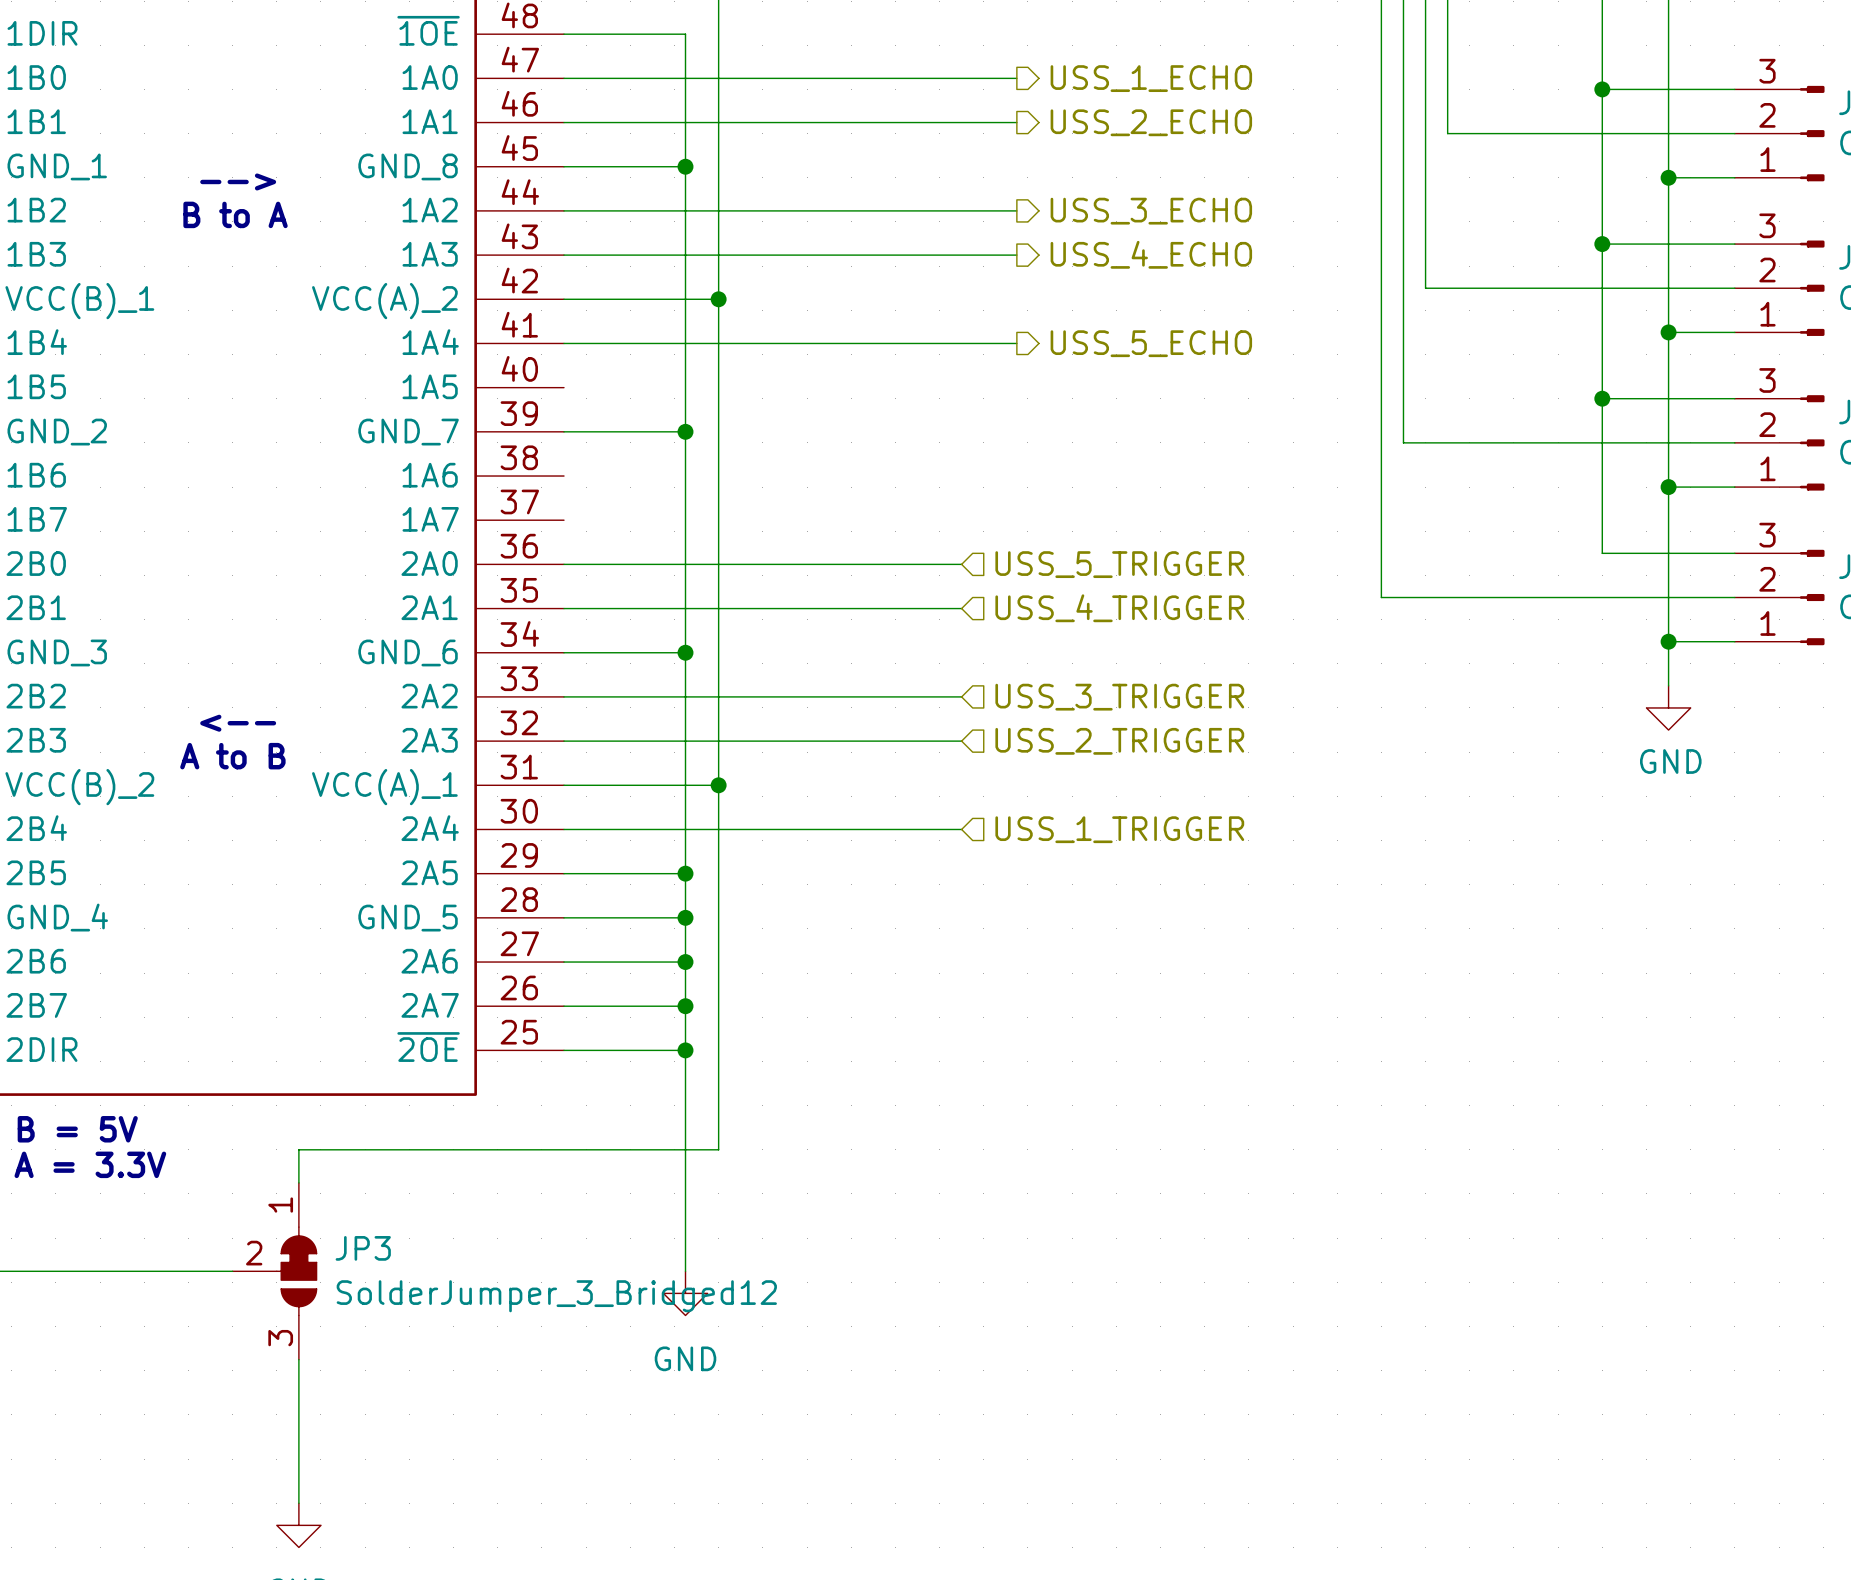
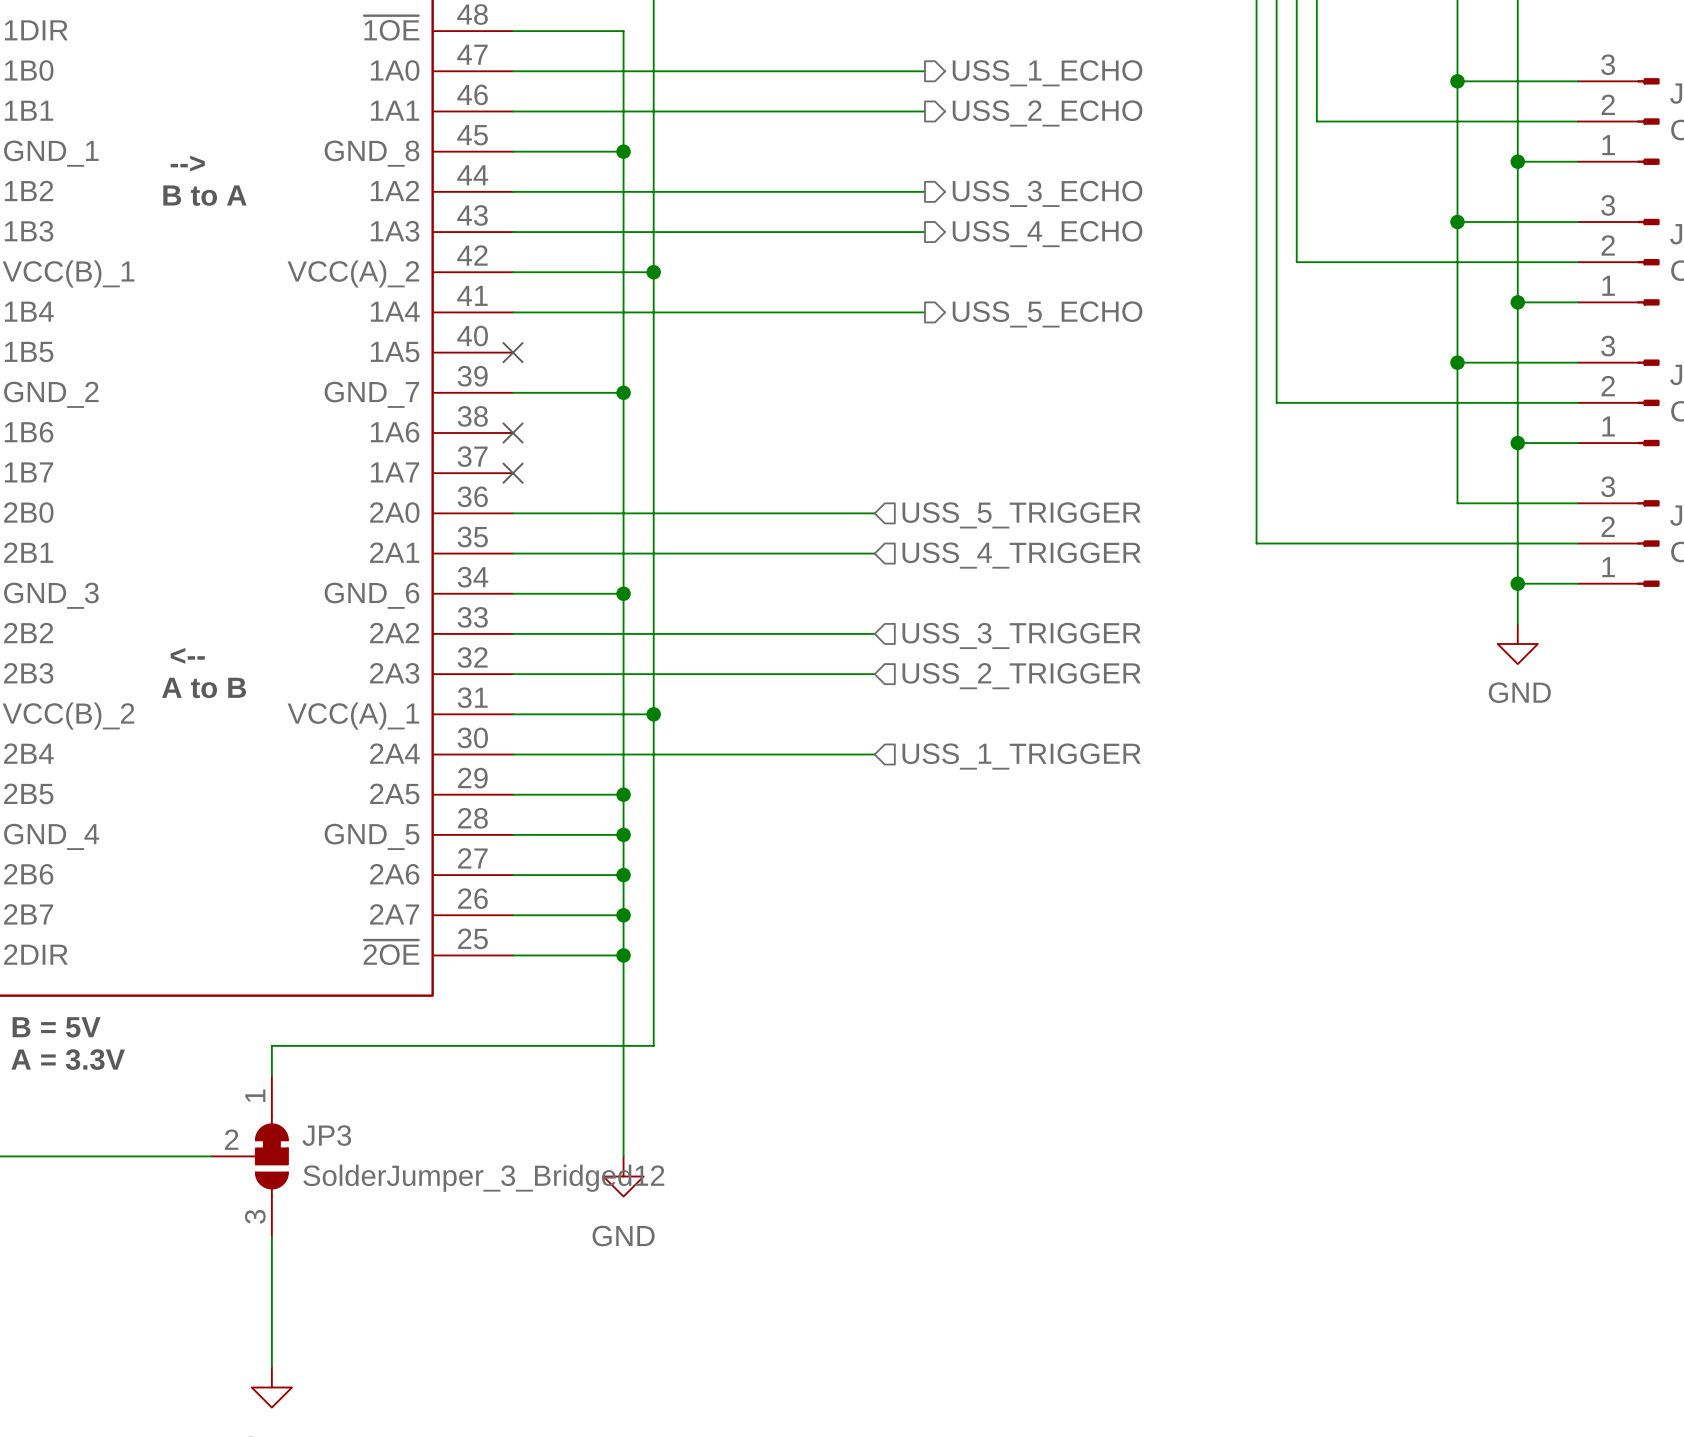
no-connect mark: none -> (513, 352)
no-connect mark: none -> (513, 432)
no-connect mark: none -> (513, 473)

